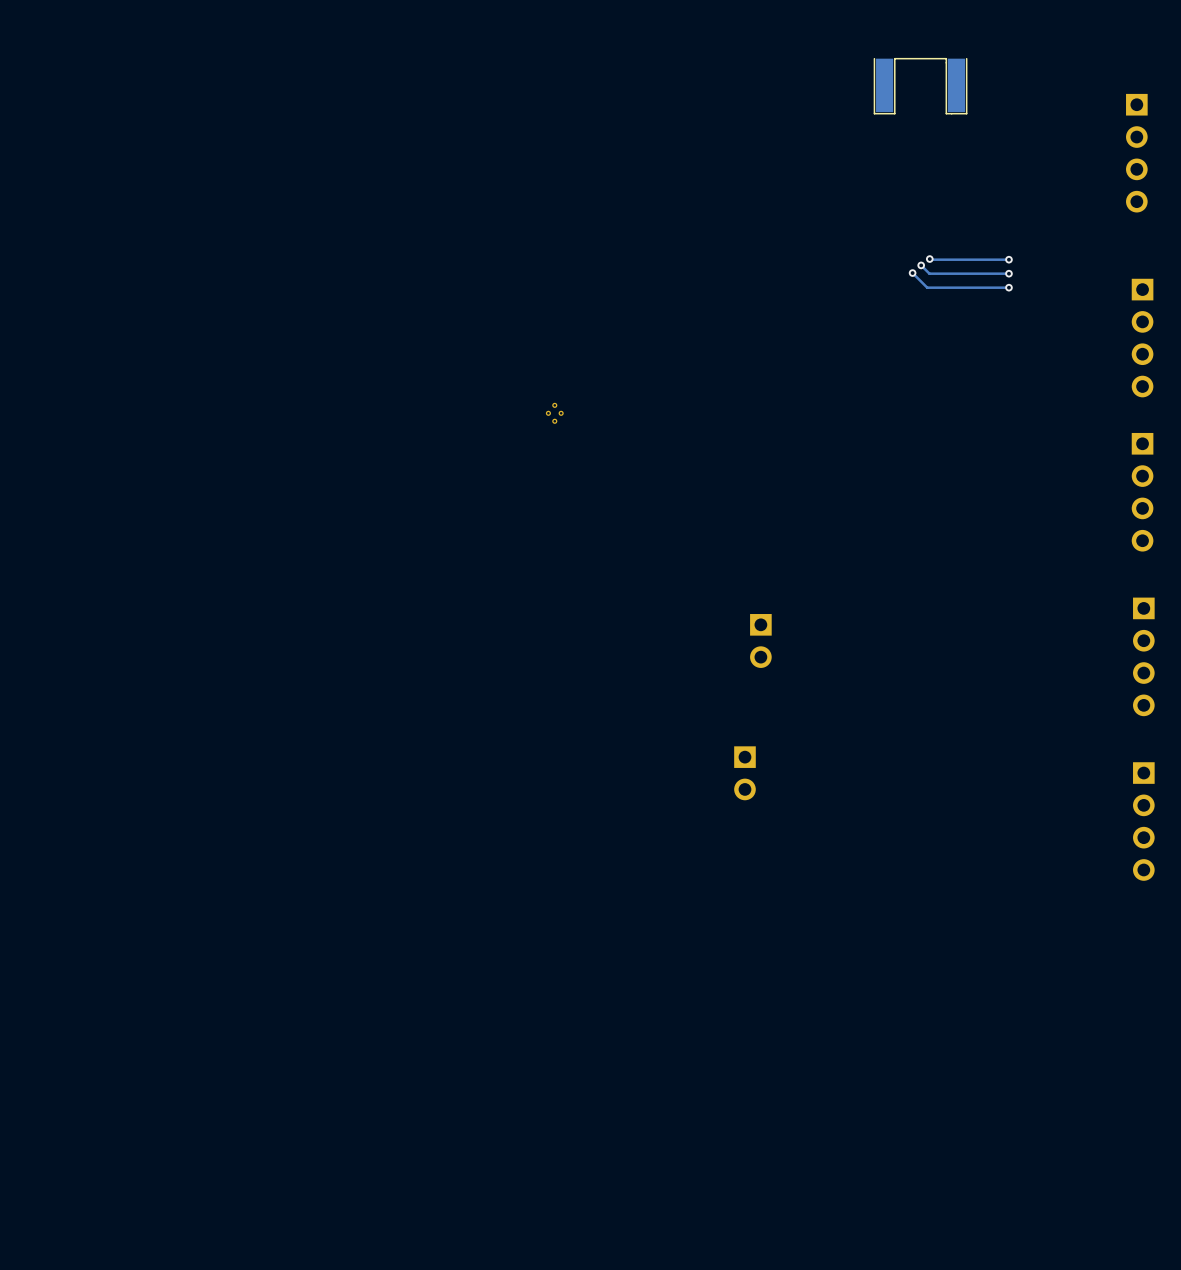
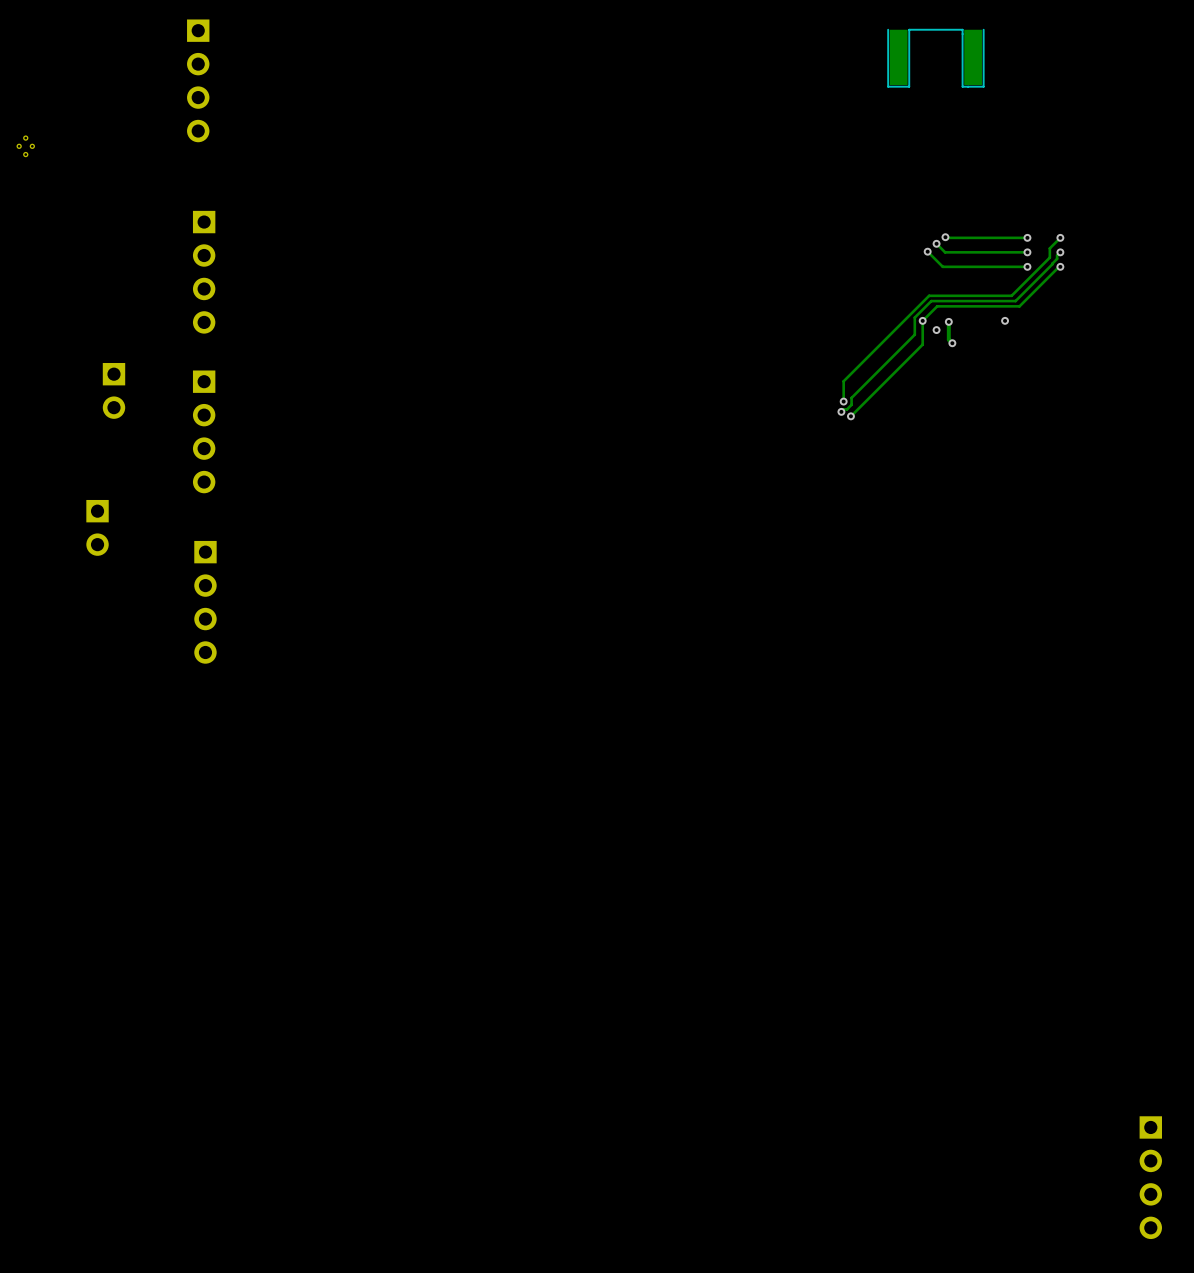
part: none -> (198, 80)
part: (1136, 153) -> none
part: none -> (25, 146)
track: none -> (1060, 237) (1049, 248) (1049, 257) (1011, 295) (929, 295) (843, 381) (843, 401)
via: none -> (1060, 237)
track: none -> (1060, 252) (1052, 264) (1015, 301) (931, 301) (914, 317) (914, 334) (851, 397) (851, 404) (841, 411)
via: none -> (1060, 252)
track: none -> (1060, 266) (1019, 306) (937, 306) (922, 320) (922, 344) (850, 416)
via: none -> (1060, 266)
part: none -> (204, 272)
part: (1142, 338) -> none
via: none -> (922, 320)
via: none -> (1005, 320)
track: none -> (948, 321) (948, 339) (952, 343)
via: none -> (948, 321)
via: none -> (936, 330)
via: none -> (952, 343)
part: none -> (114, 390)
part: (554, 413) -> none
via: none -> (843, 401)
via: none -> (841, 411)
via: none -> (850, 416)
part: none -> (204, 431)
part: (1142, 492) -> none
part: none -> (97, 527)
part: none -> (205, 602)
part: (760, 640) -> none
part: (1143, 656) -> none
part: (744, 773) -> none
part: (1143, 821) -> none
part: none -> (1150, 1177)

